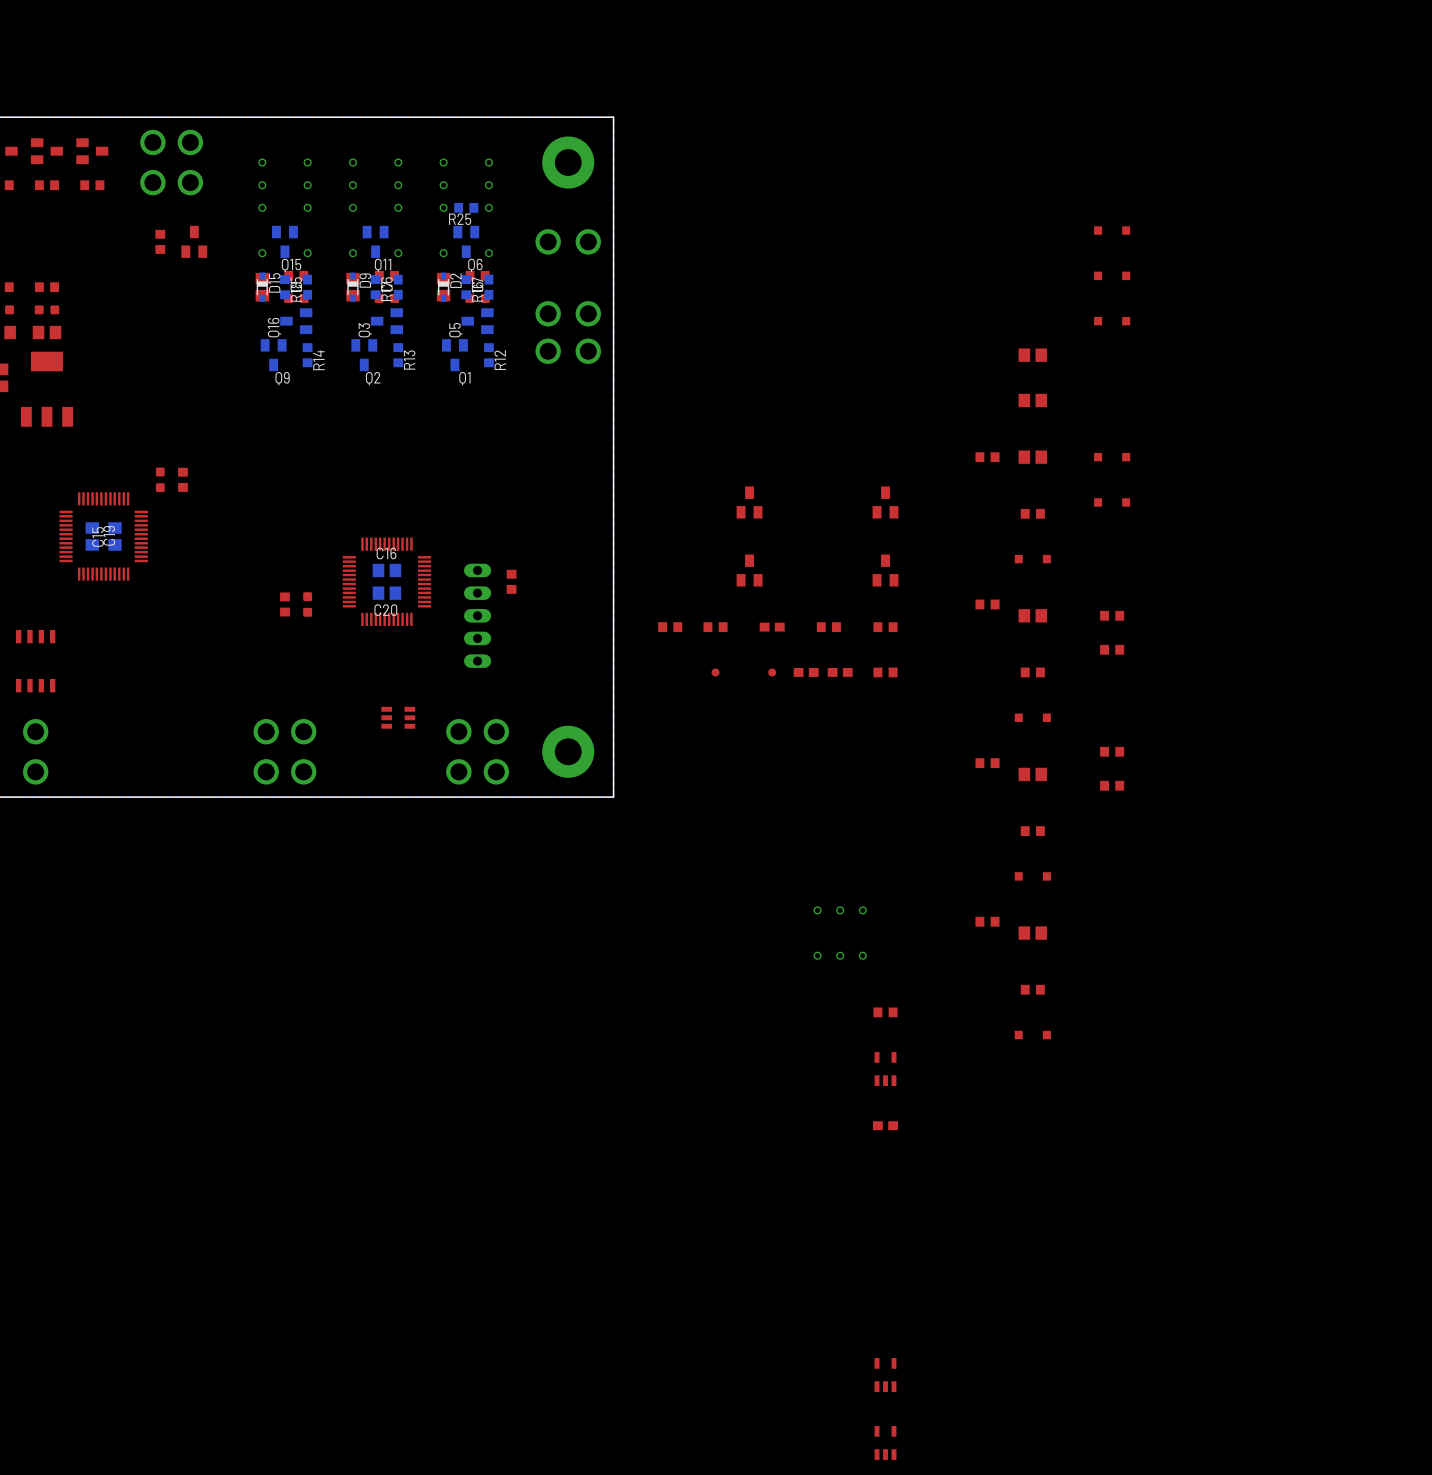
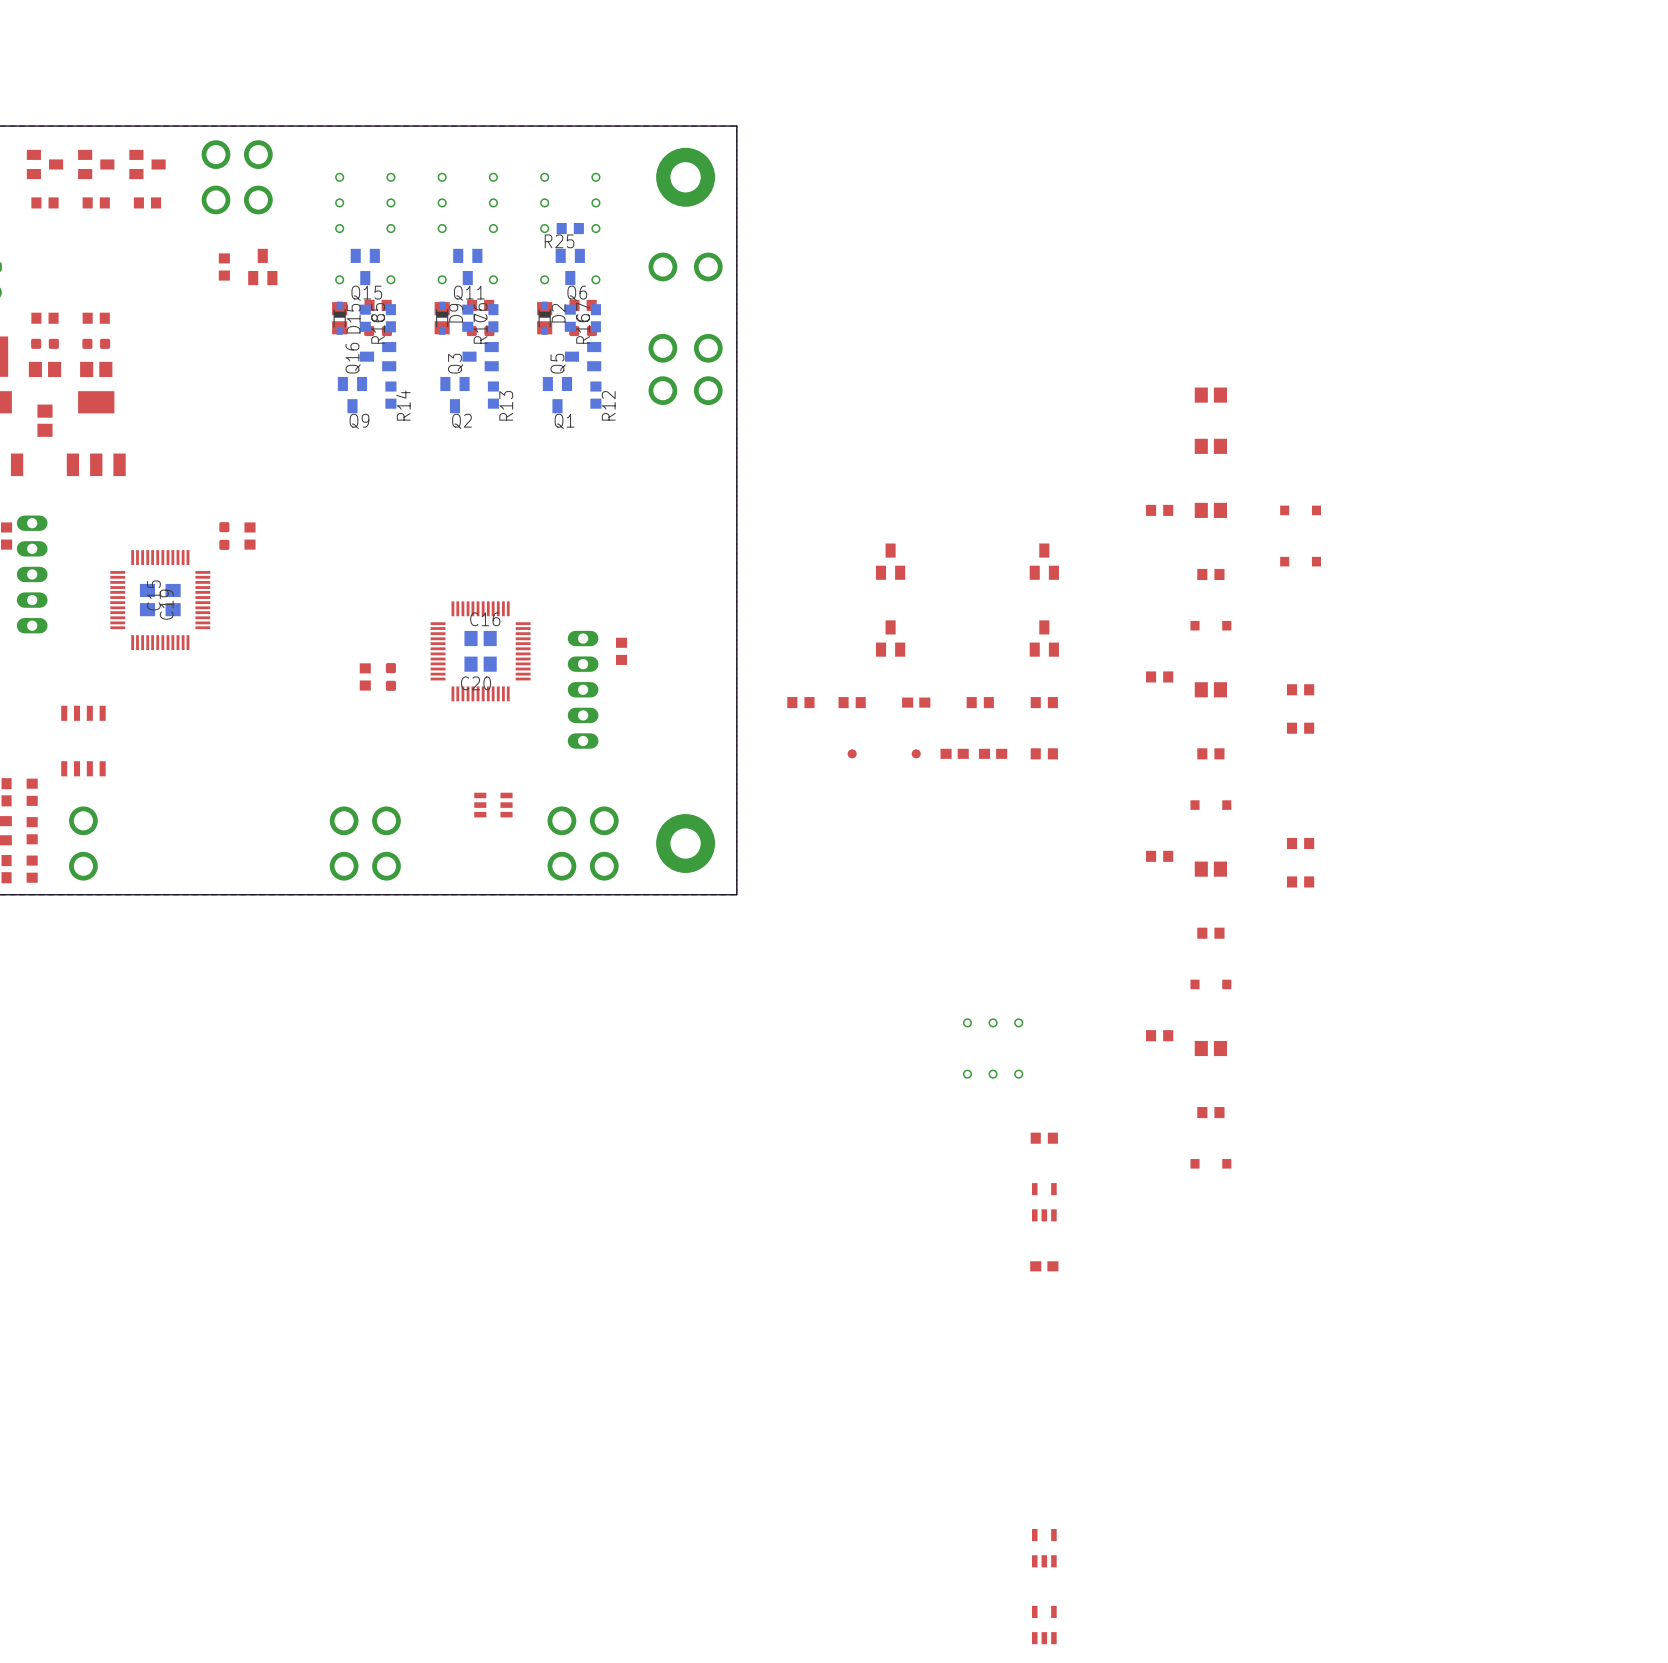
part: (1112, 230) -> none
part: (1112, 275) -> none
part: (1112, 321) -> none

